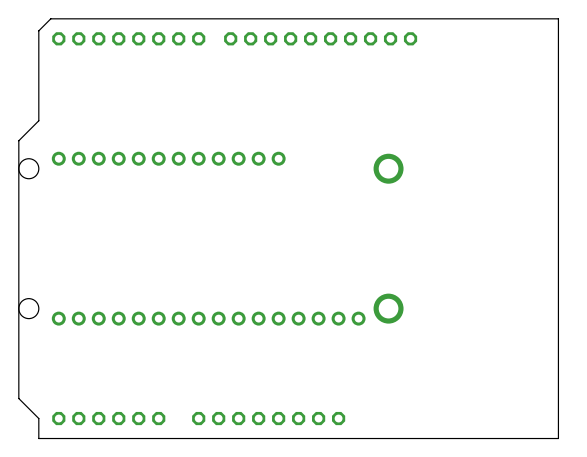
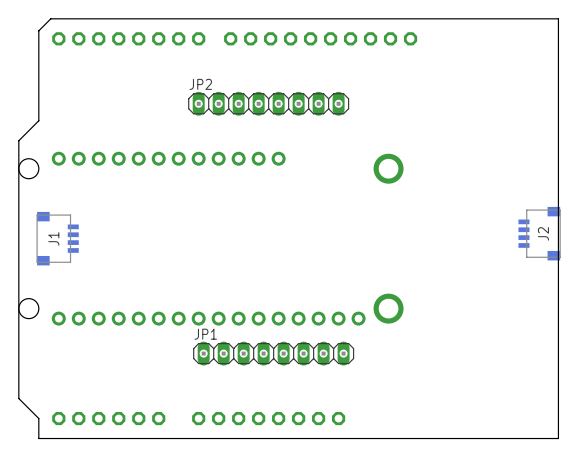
JP2: none -> (268, 103)
J2: none -> (539, 233)
J1: none -> (57, 238)
JP1: none -> (273, 353)

